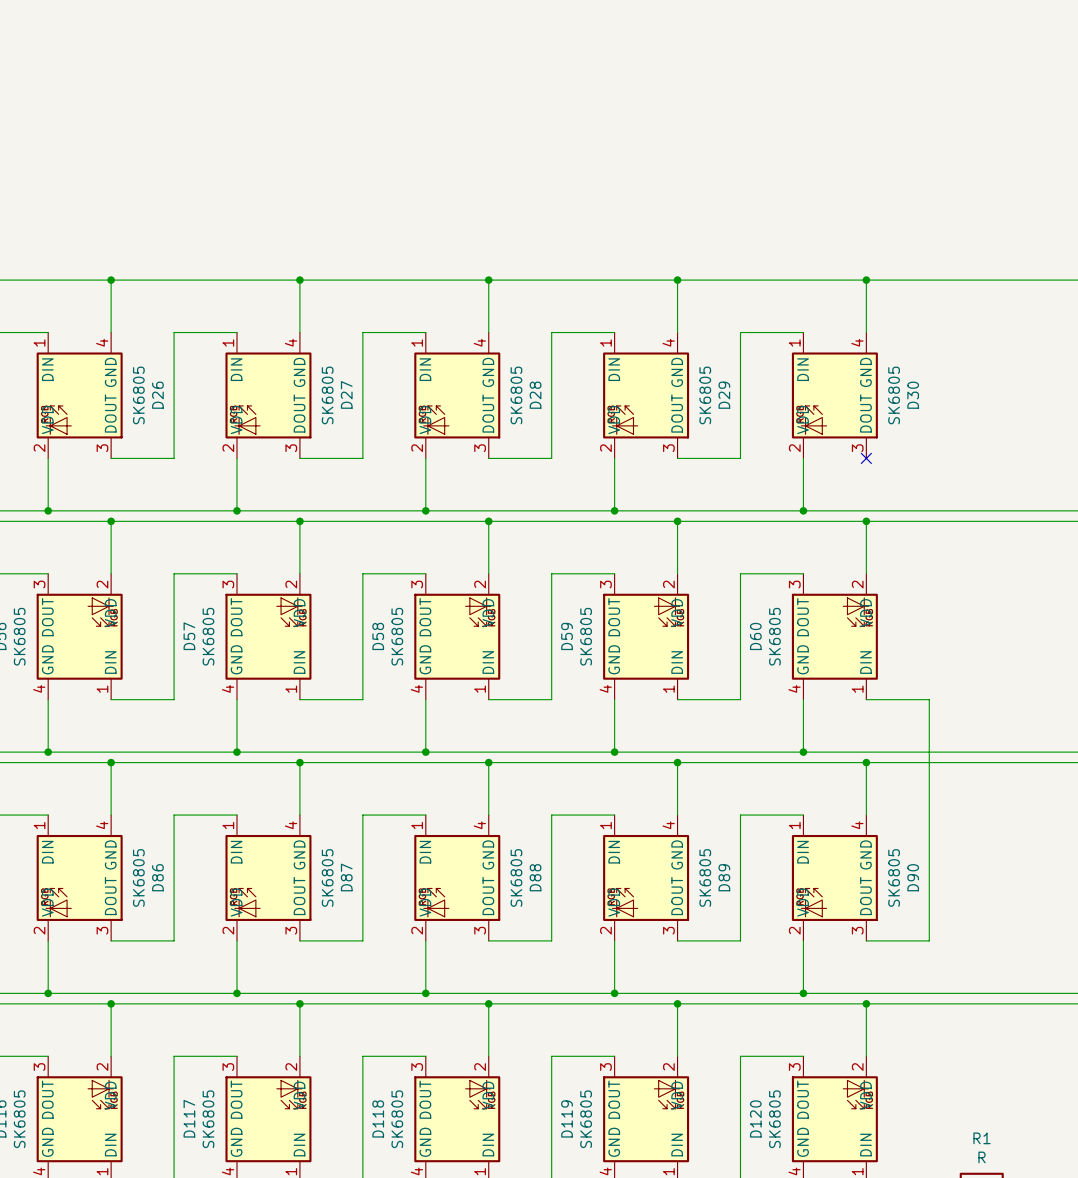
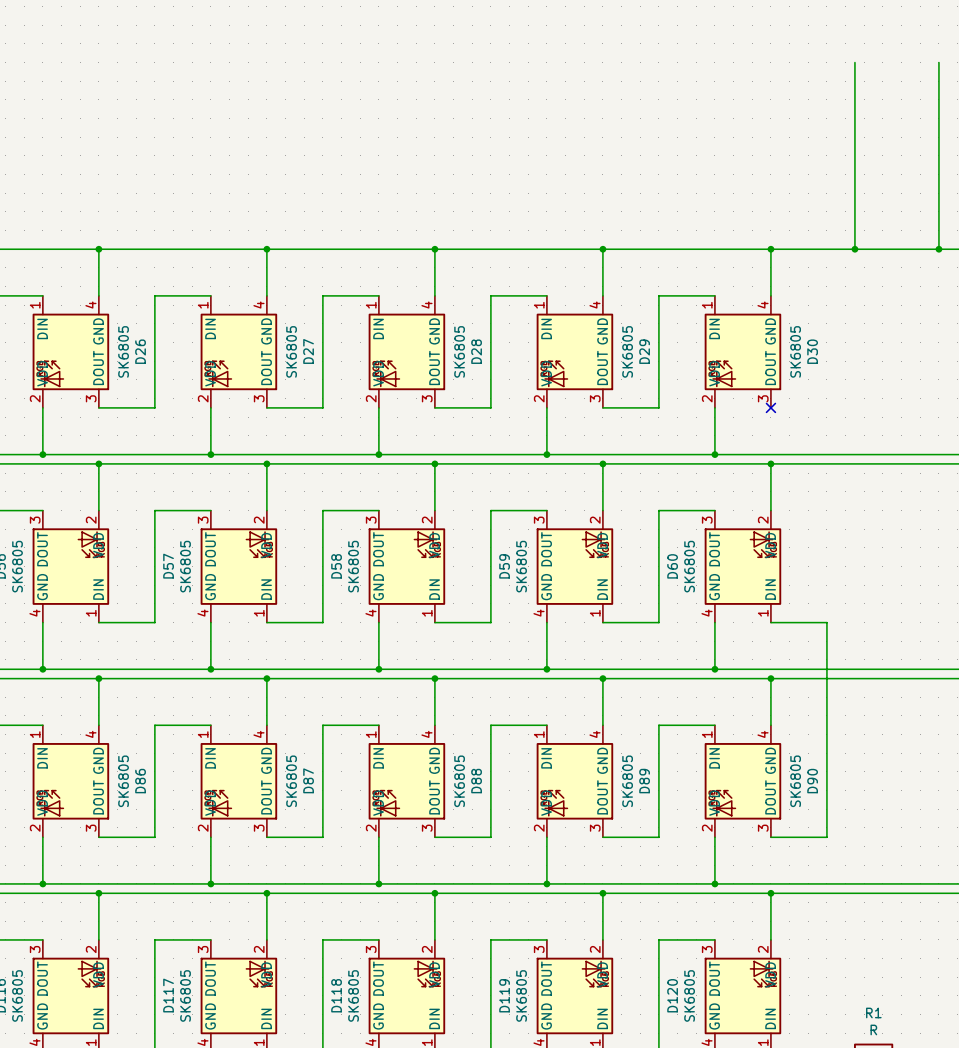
wire: none -> (854, 62) (854, 249)
wire: none -> (938, 62) (938, 249)
junction: none -> (854, 249)
junction: none -> (938, 249)

